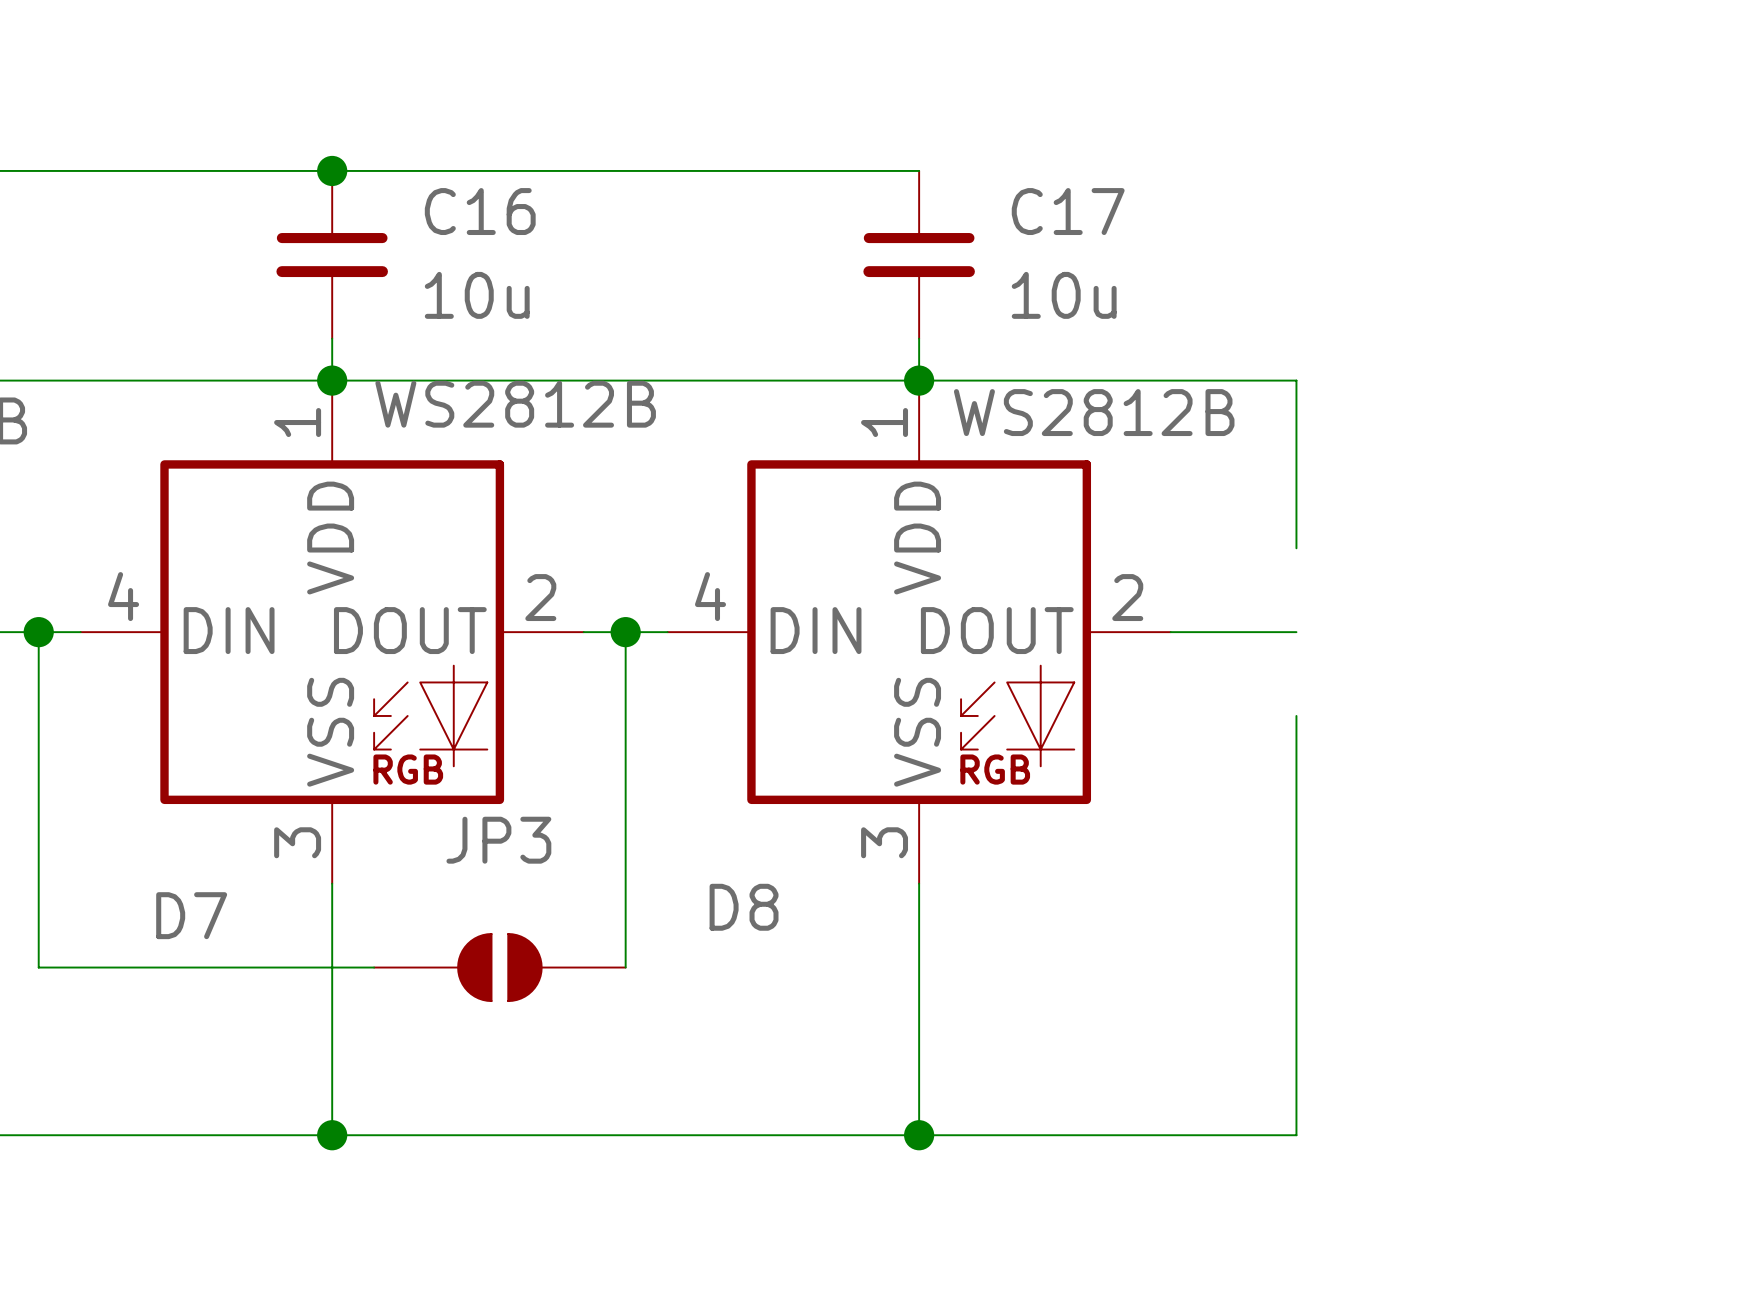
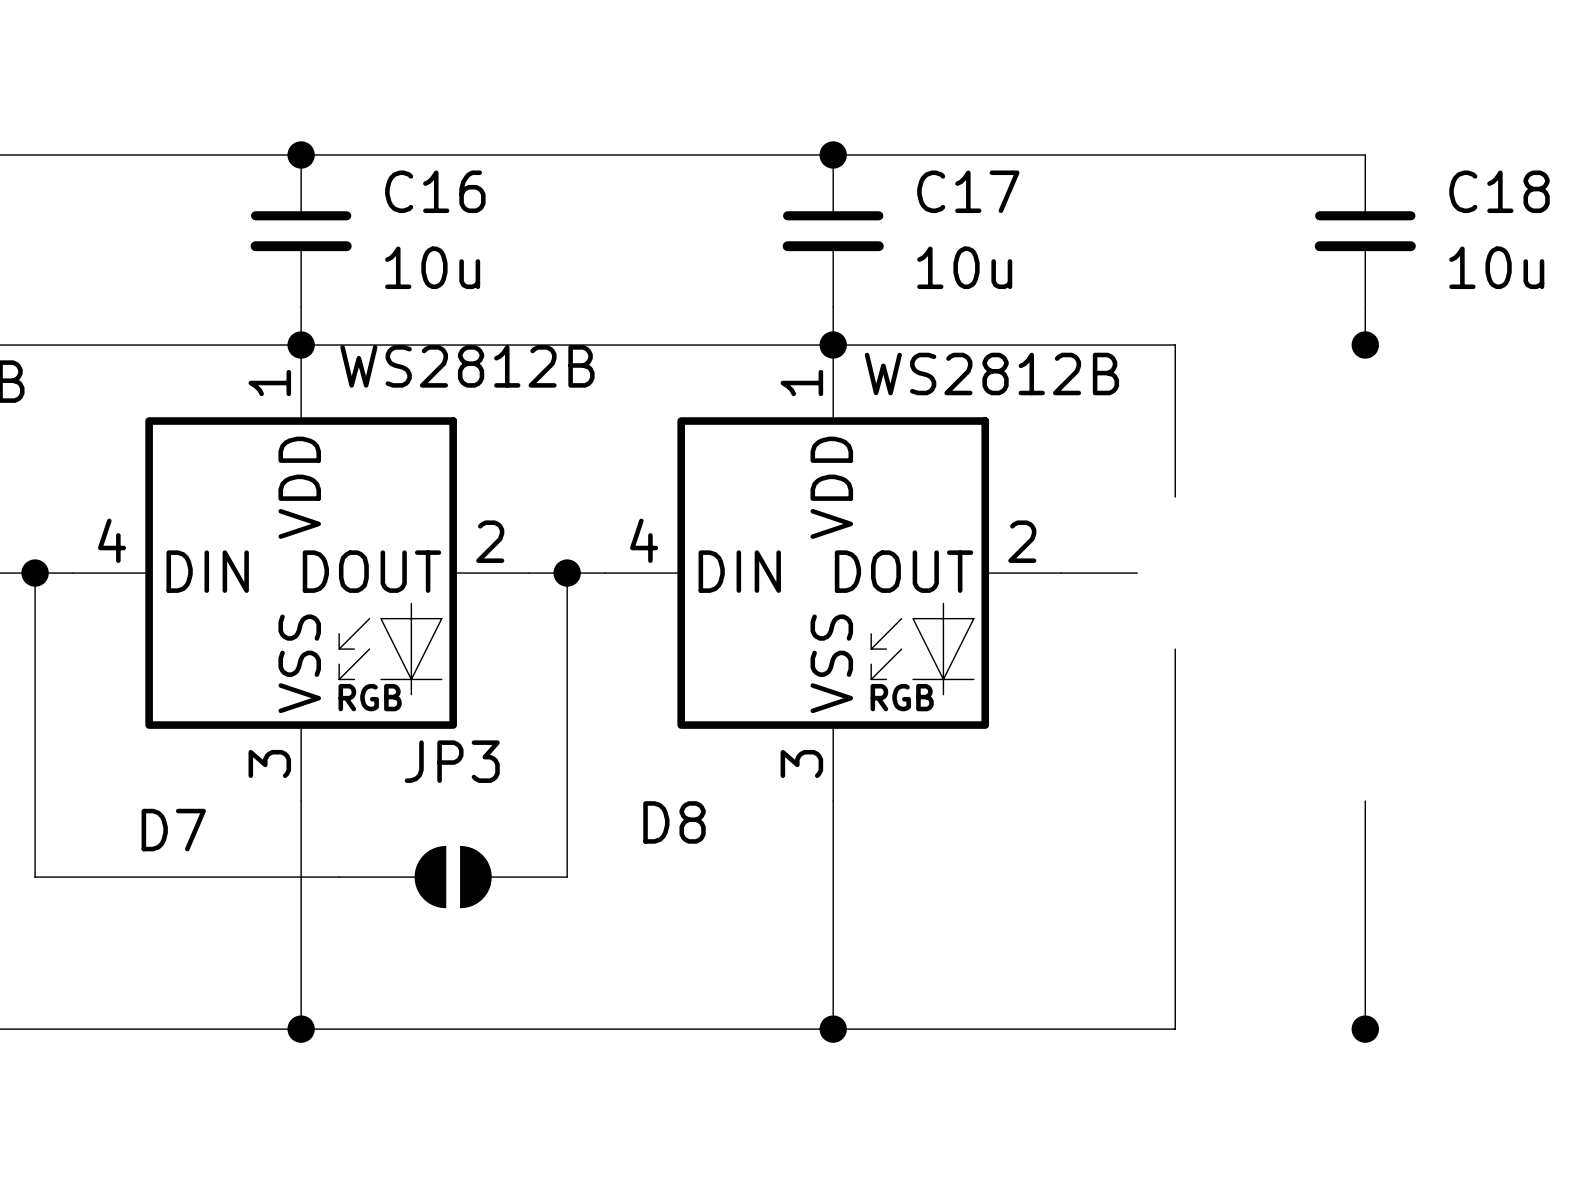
wire: none -> (833, 154) (1365, 154)
junction: none -> (833, 154)
C18: none -> 10u (1365, 231)
wire: none -> (1365, 307) (1365, 345)
junction: none -> (1365, 345)
wire: (1254, 632) (1296, 632) -> none
wire: none -> (1365, 801) (1365, 1029)
junction: none -> (1365, 1029)

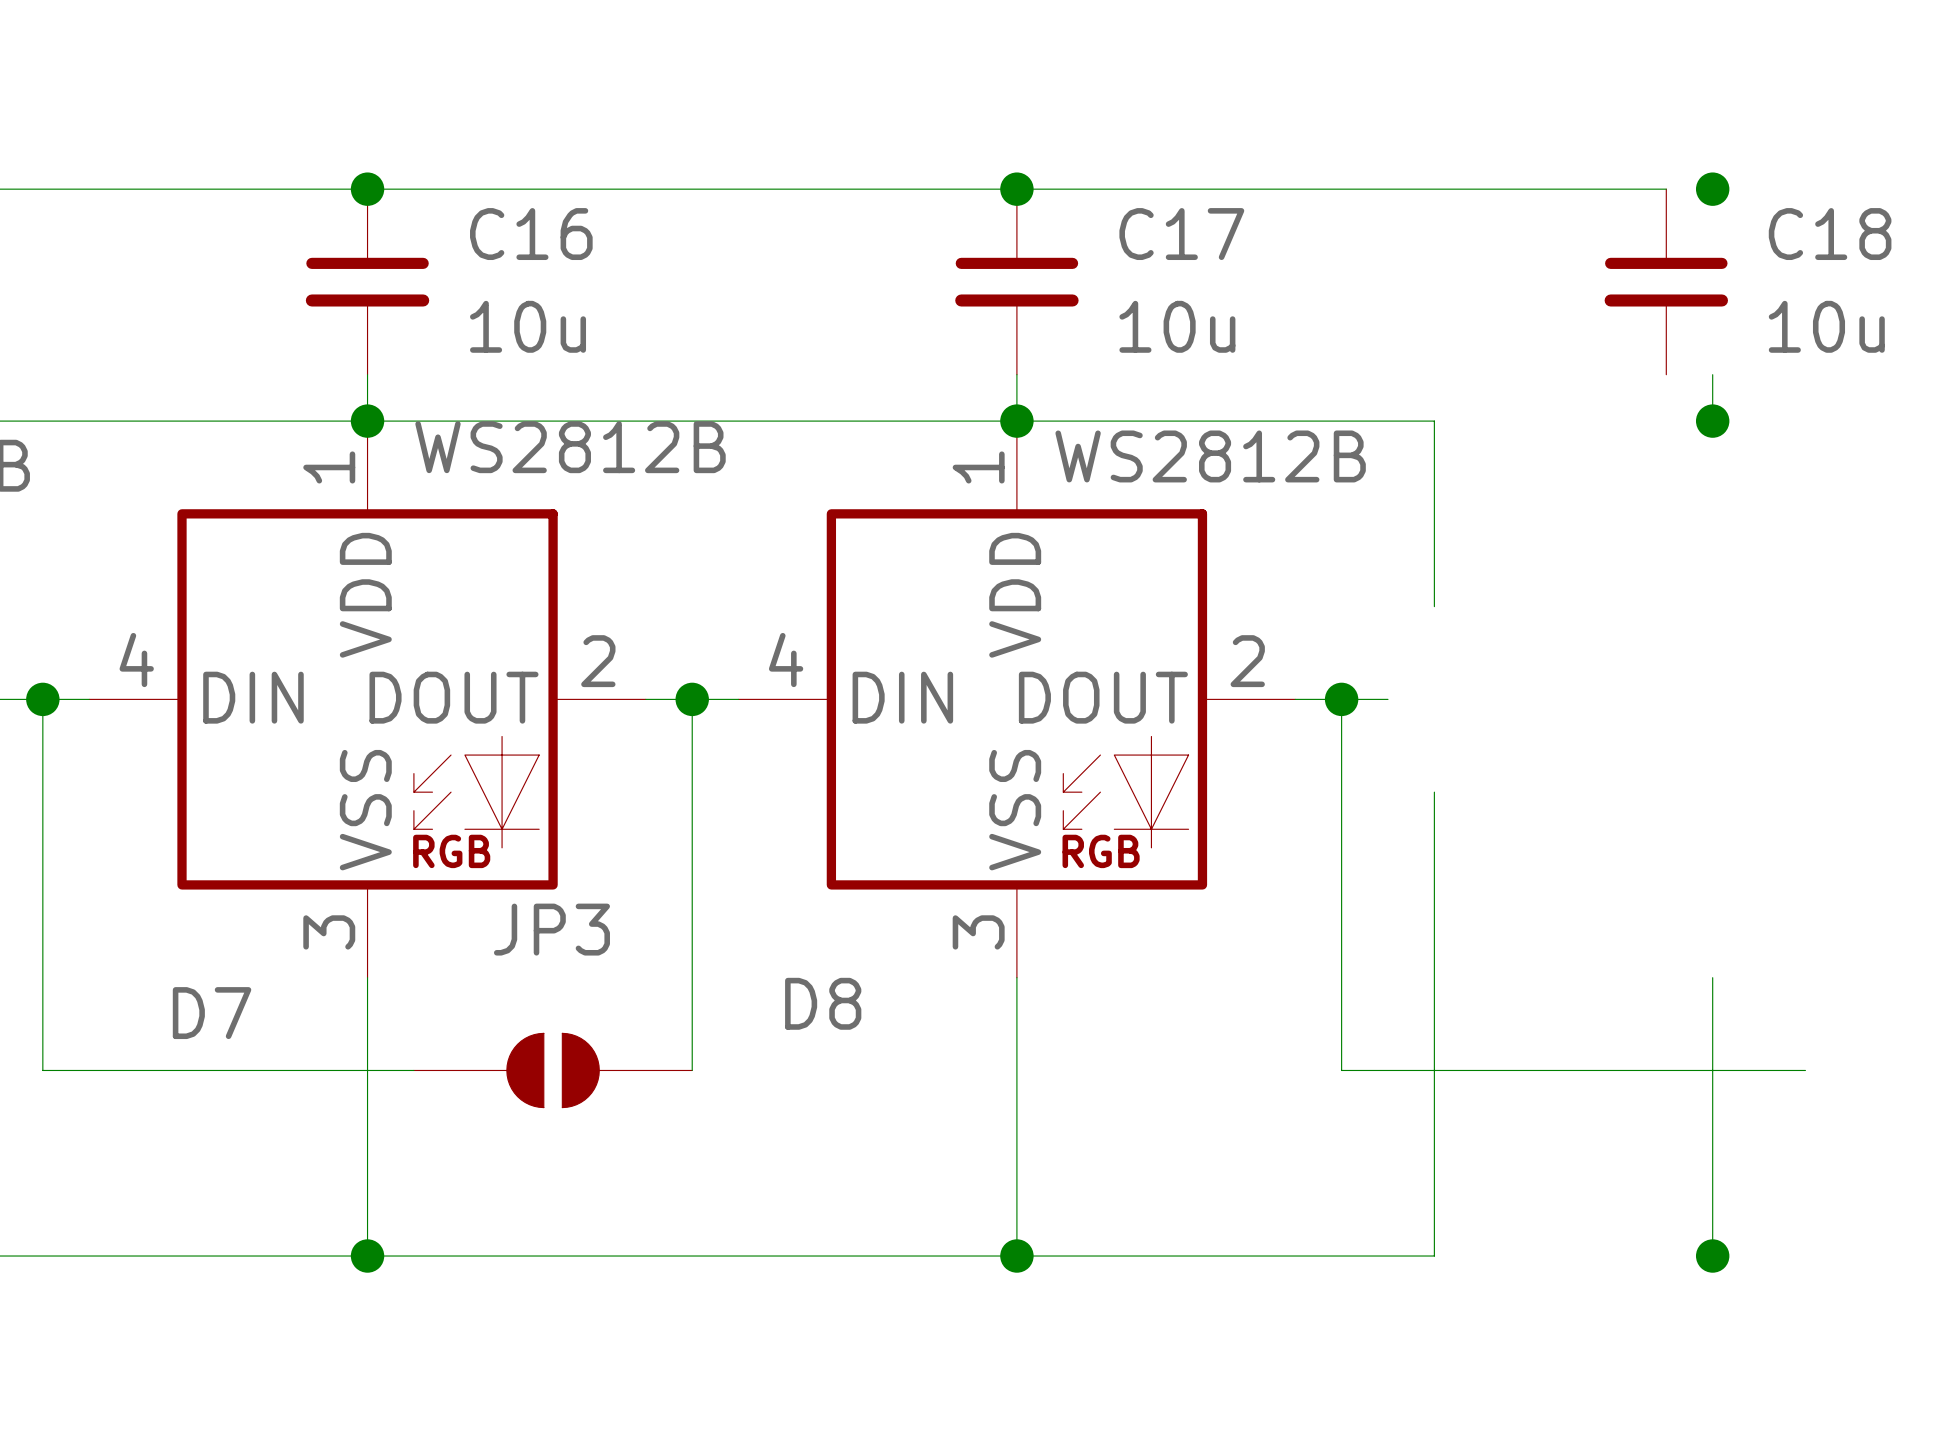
junction: none -> (1712, 189)
wire: (1365, 307) (1365, 345) -> (1712, 374) (1712, 421)
junction position: (1365, 345) -> (1712, 421)
wire: none -> (1341, 699) (1341, 1070) (1805, 1070)
junction: none -> (1341, 699)
wire: (1365, 801) (1365, 1029) -> (1712, 977) (1712, 1256)
junction position: (1365, 1029) -> (1712, 1256)

